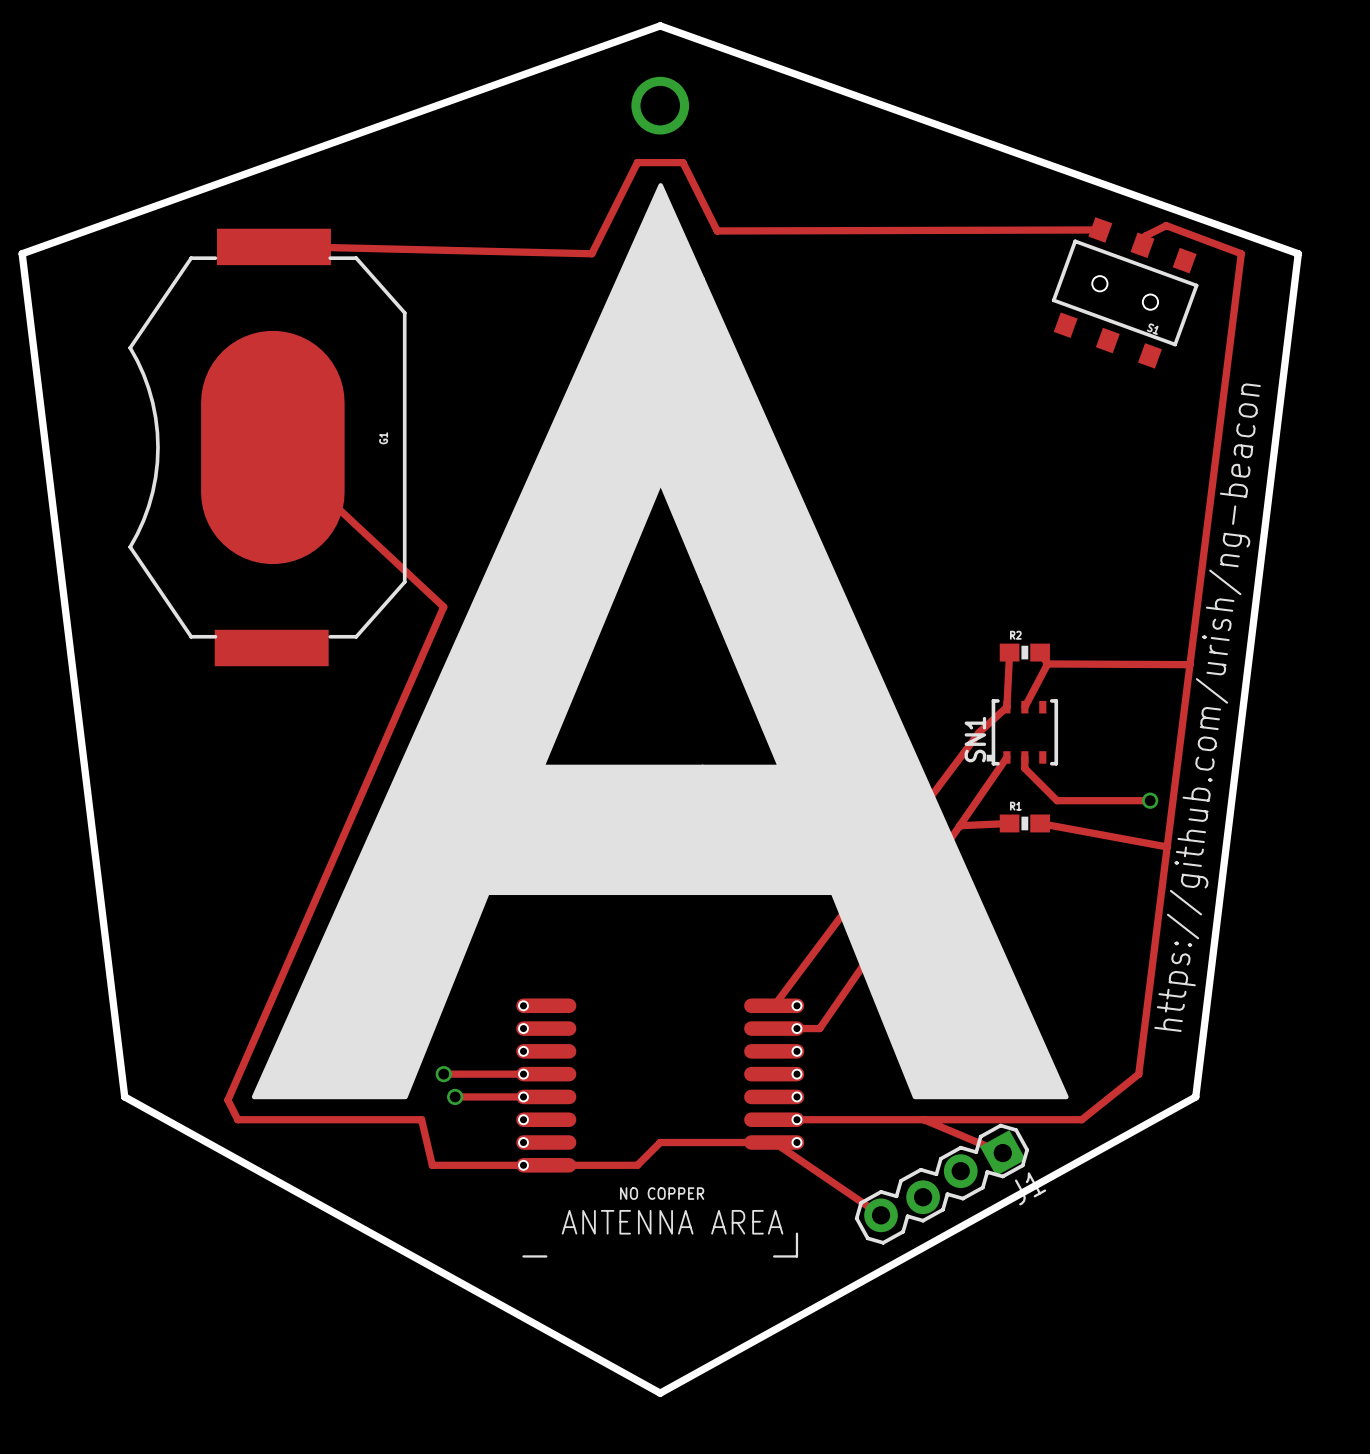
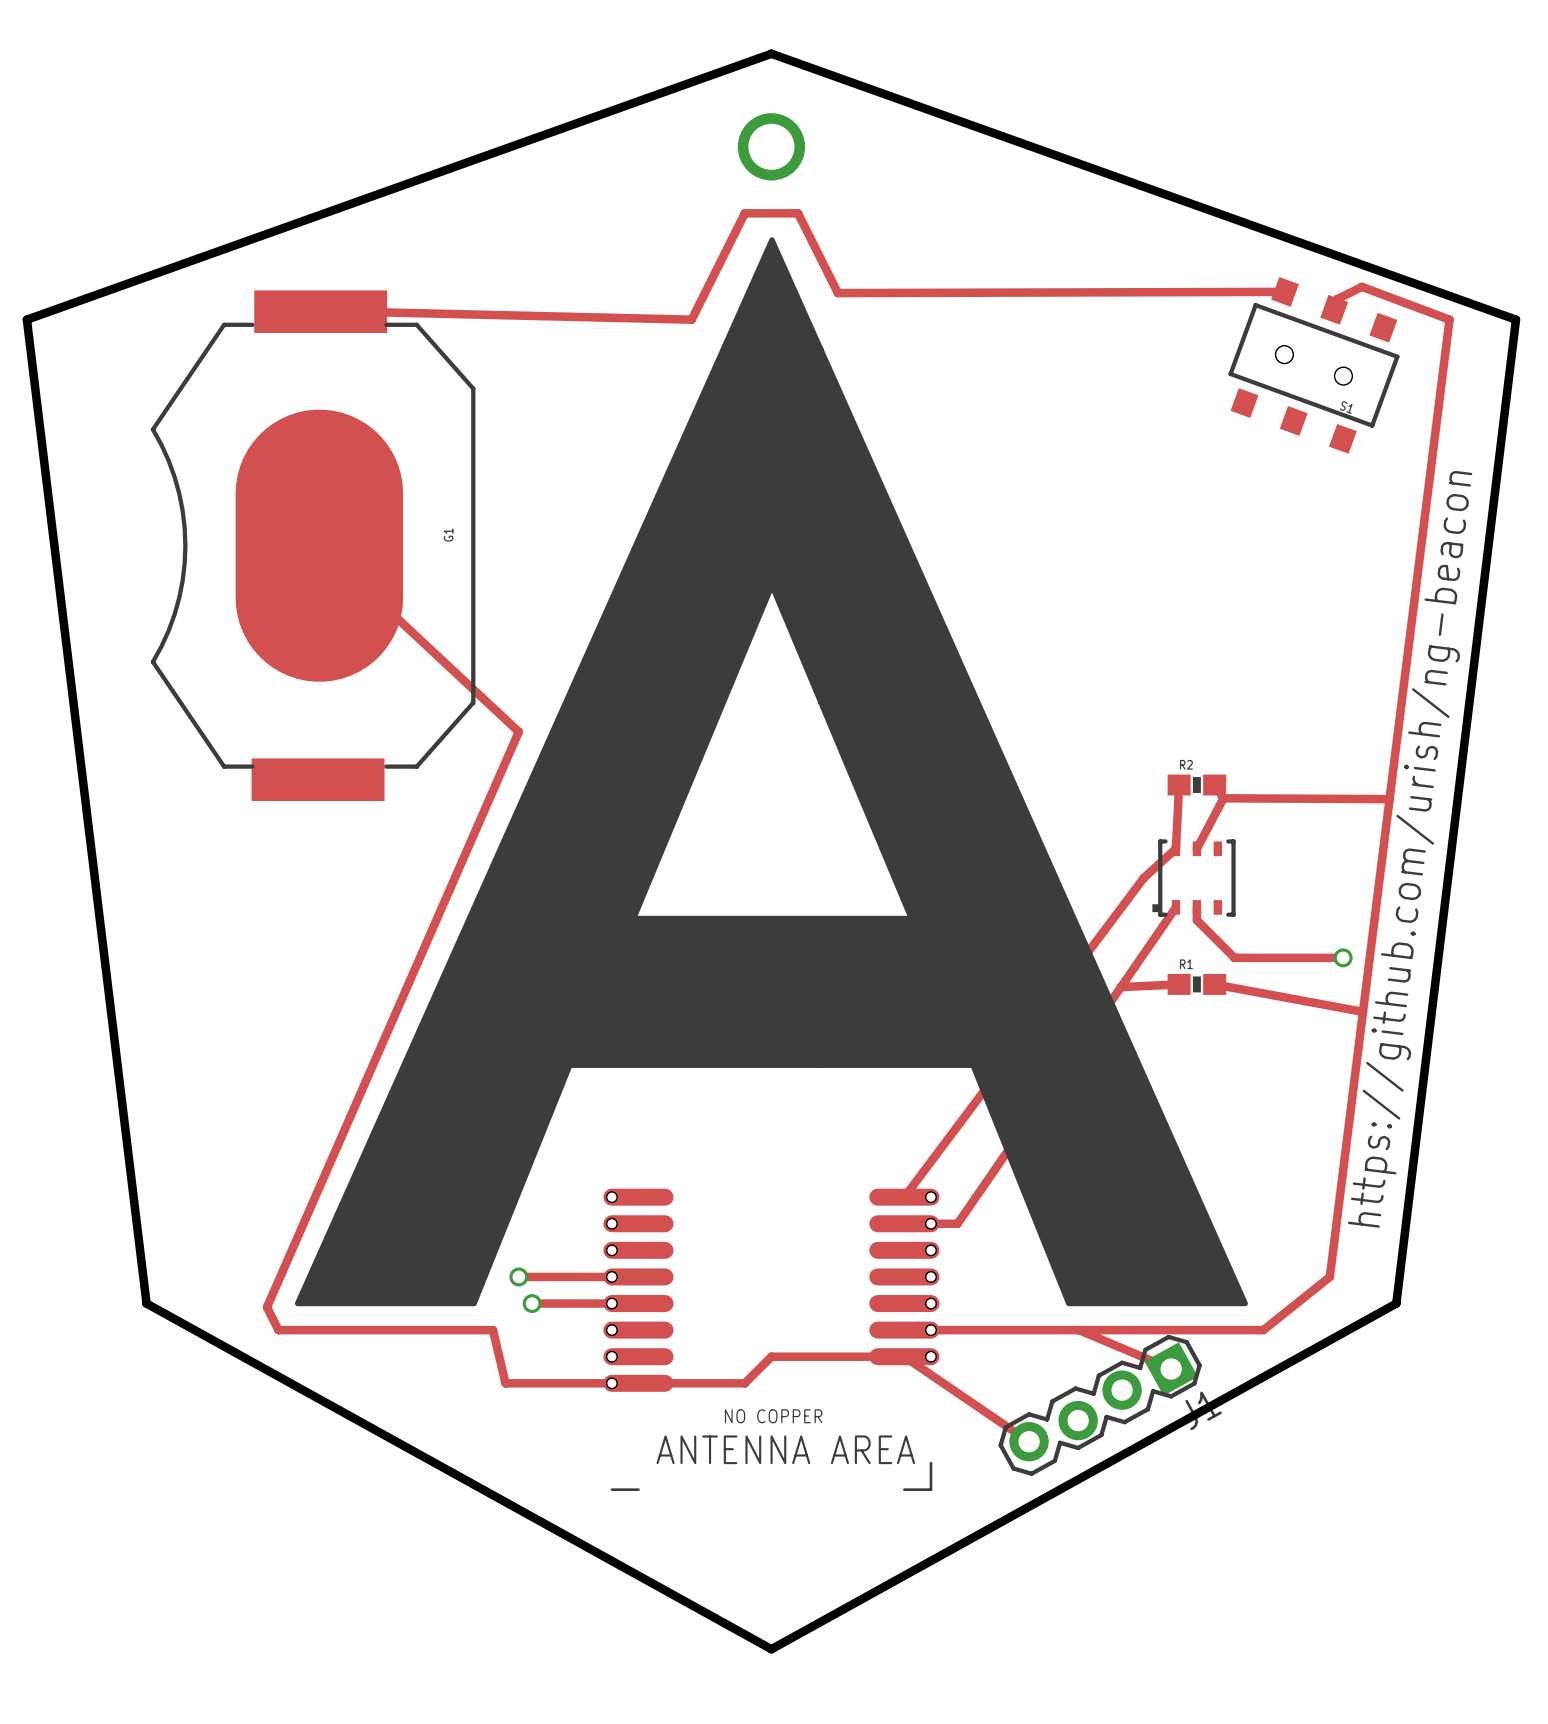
SN1 name: SN1 (975, 739) -> none

